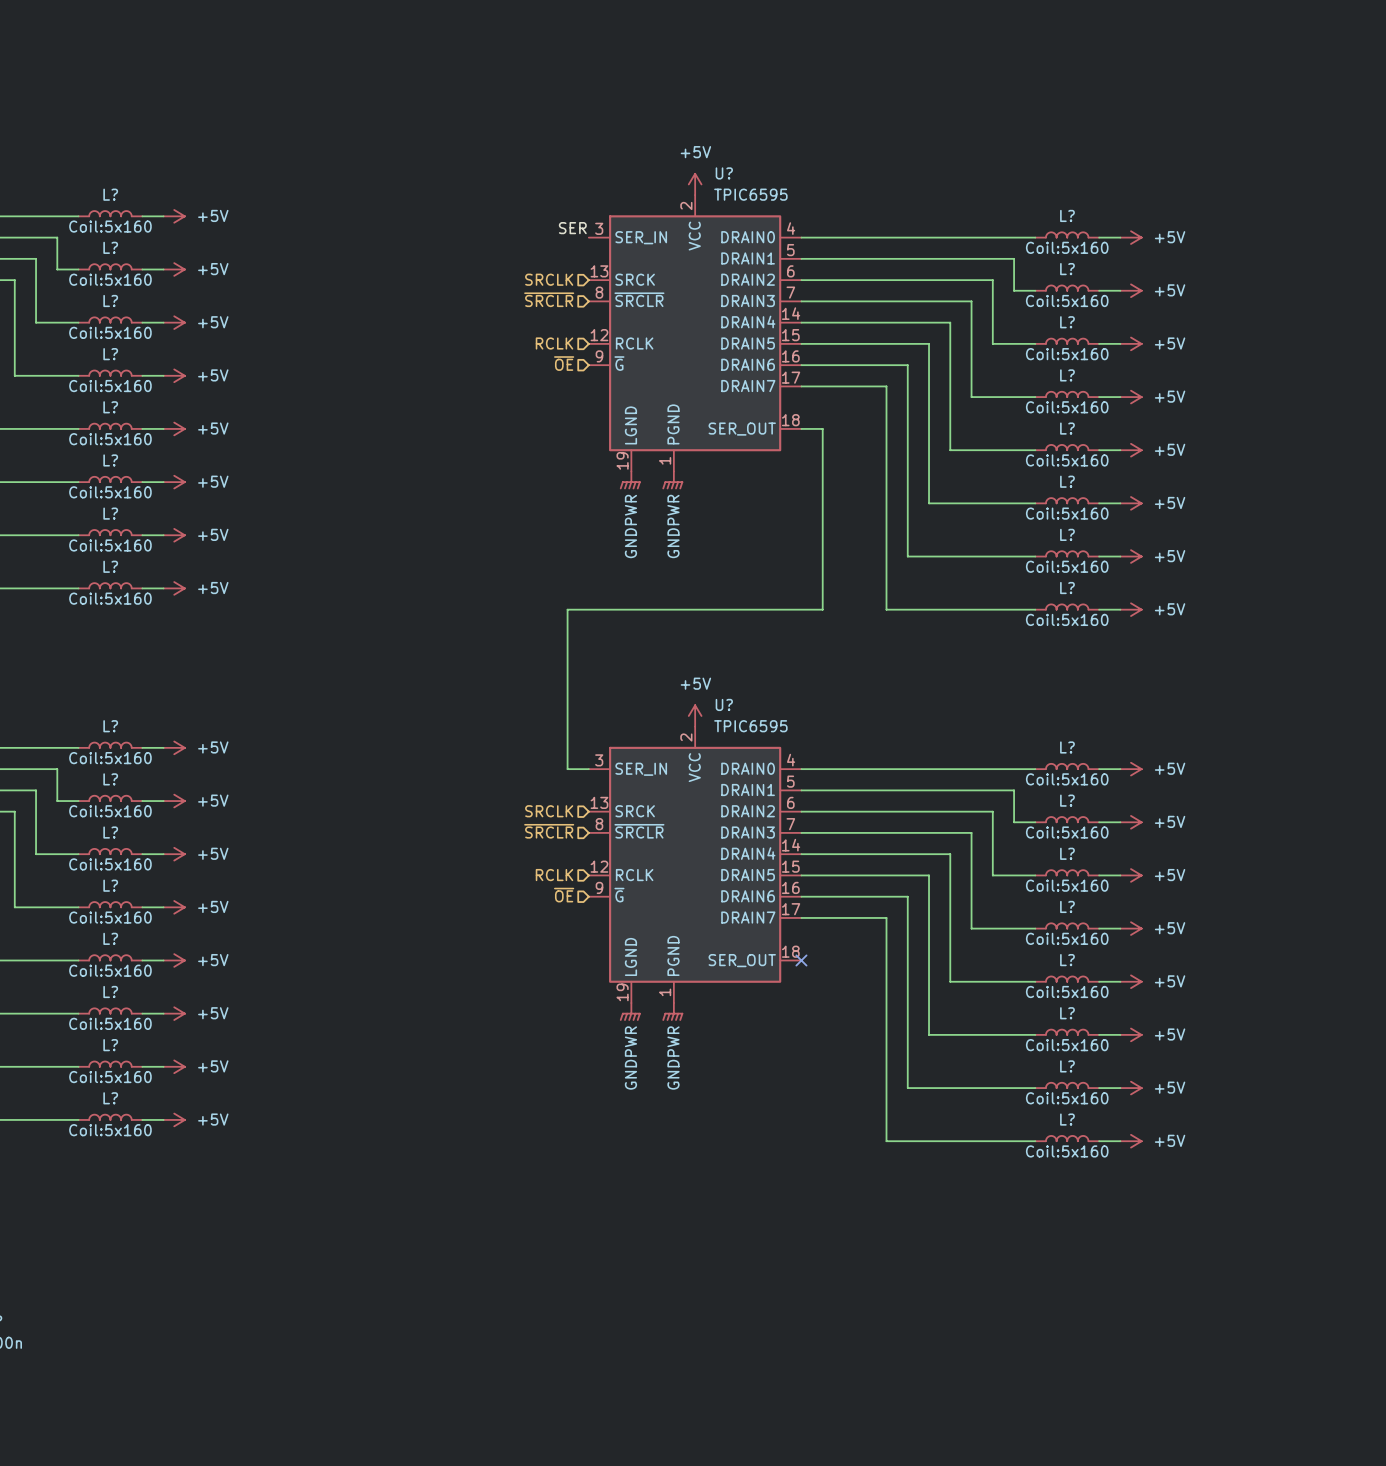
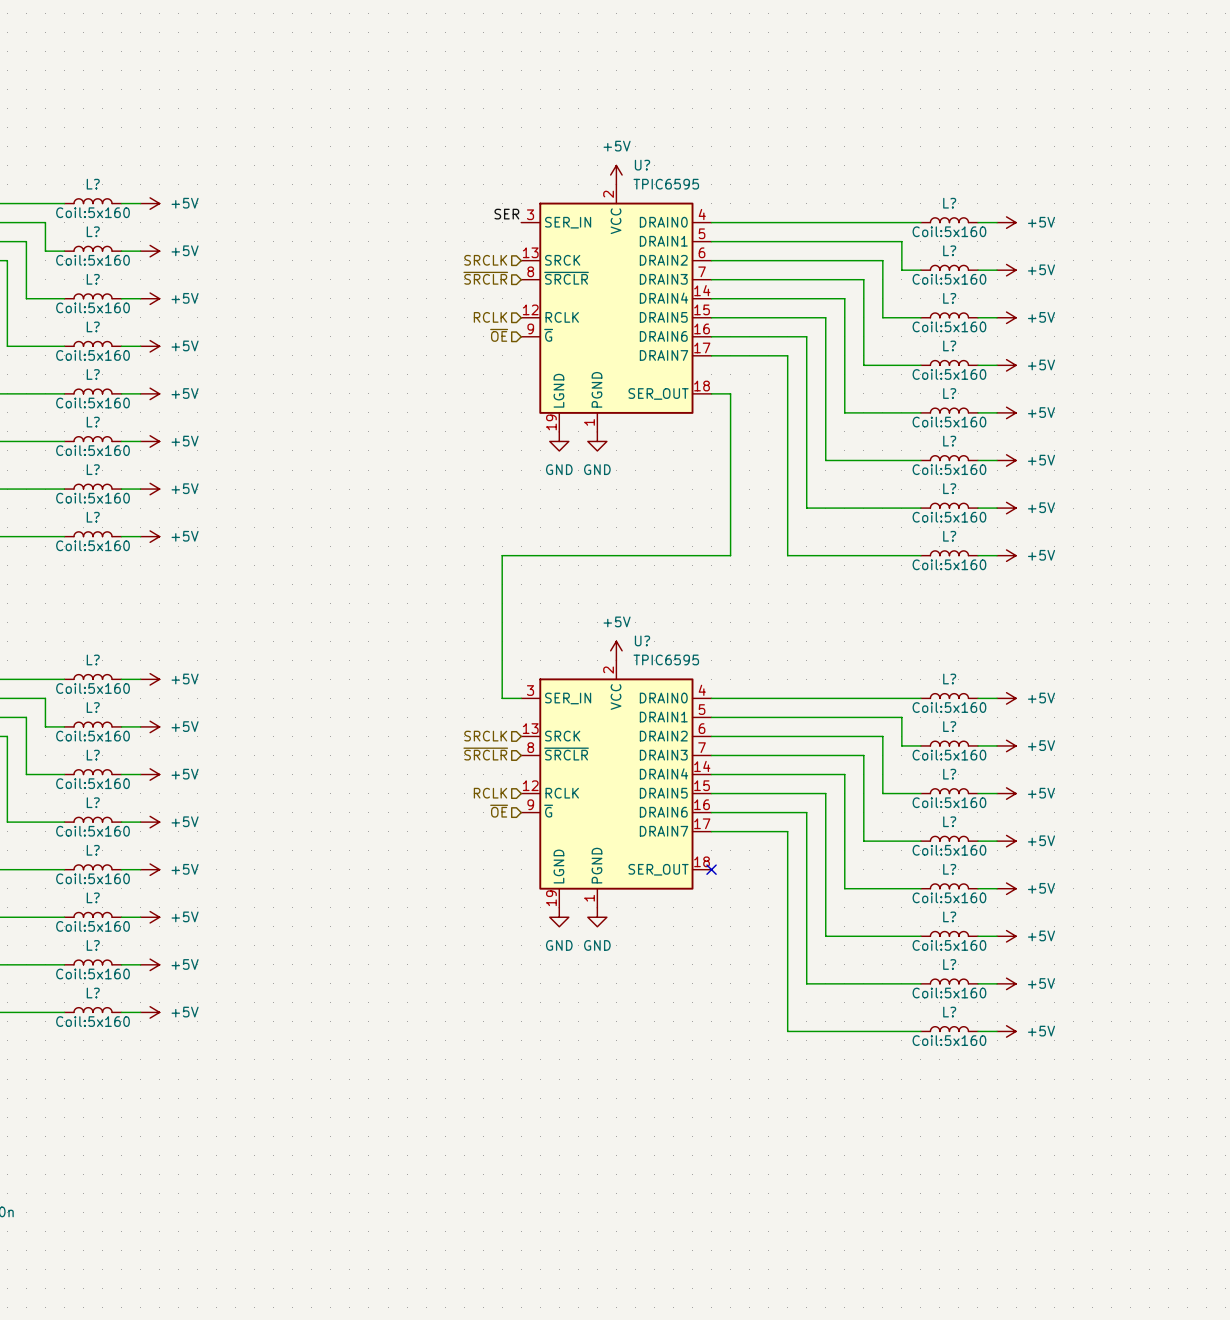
power symbol: GNDPWR (630, 480) -> GND (559, 441)
power symbol: GNDPWR (672, 480) -> GND (597, 441)
power symbol: GNDPWR (630, 1011) -> GND (559, 917)
power symbol: GNDPWR (672, 1011) -> GND (597, 917)

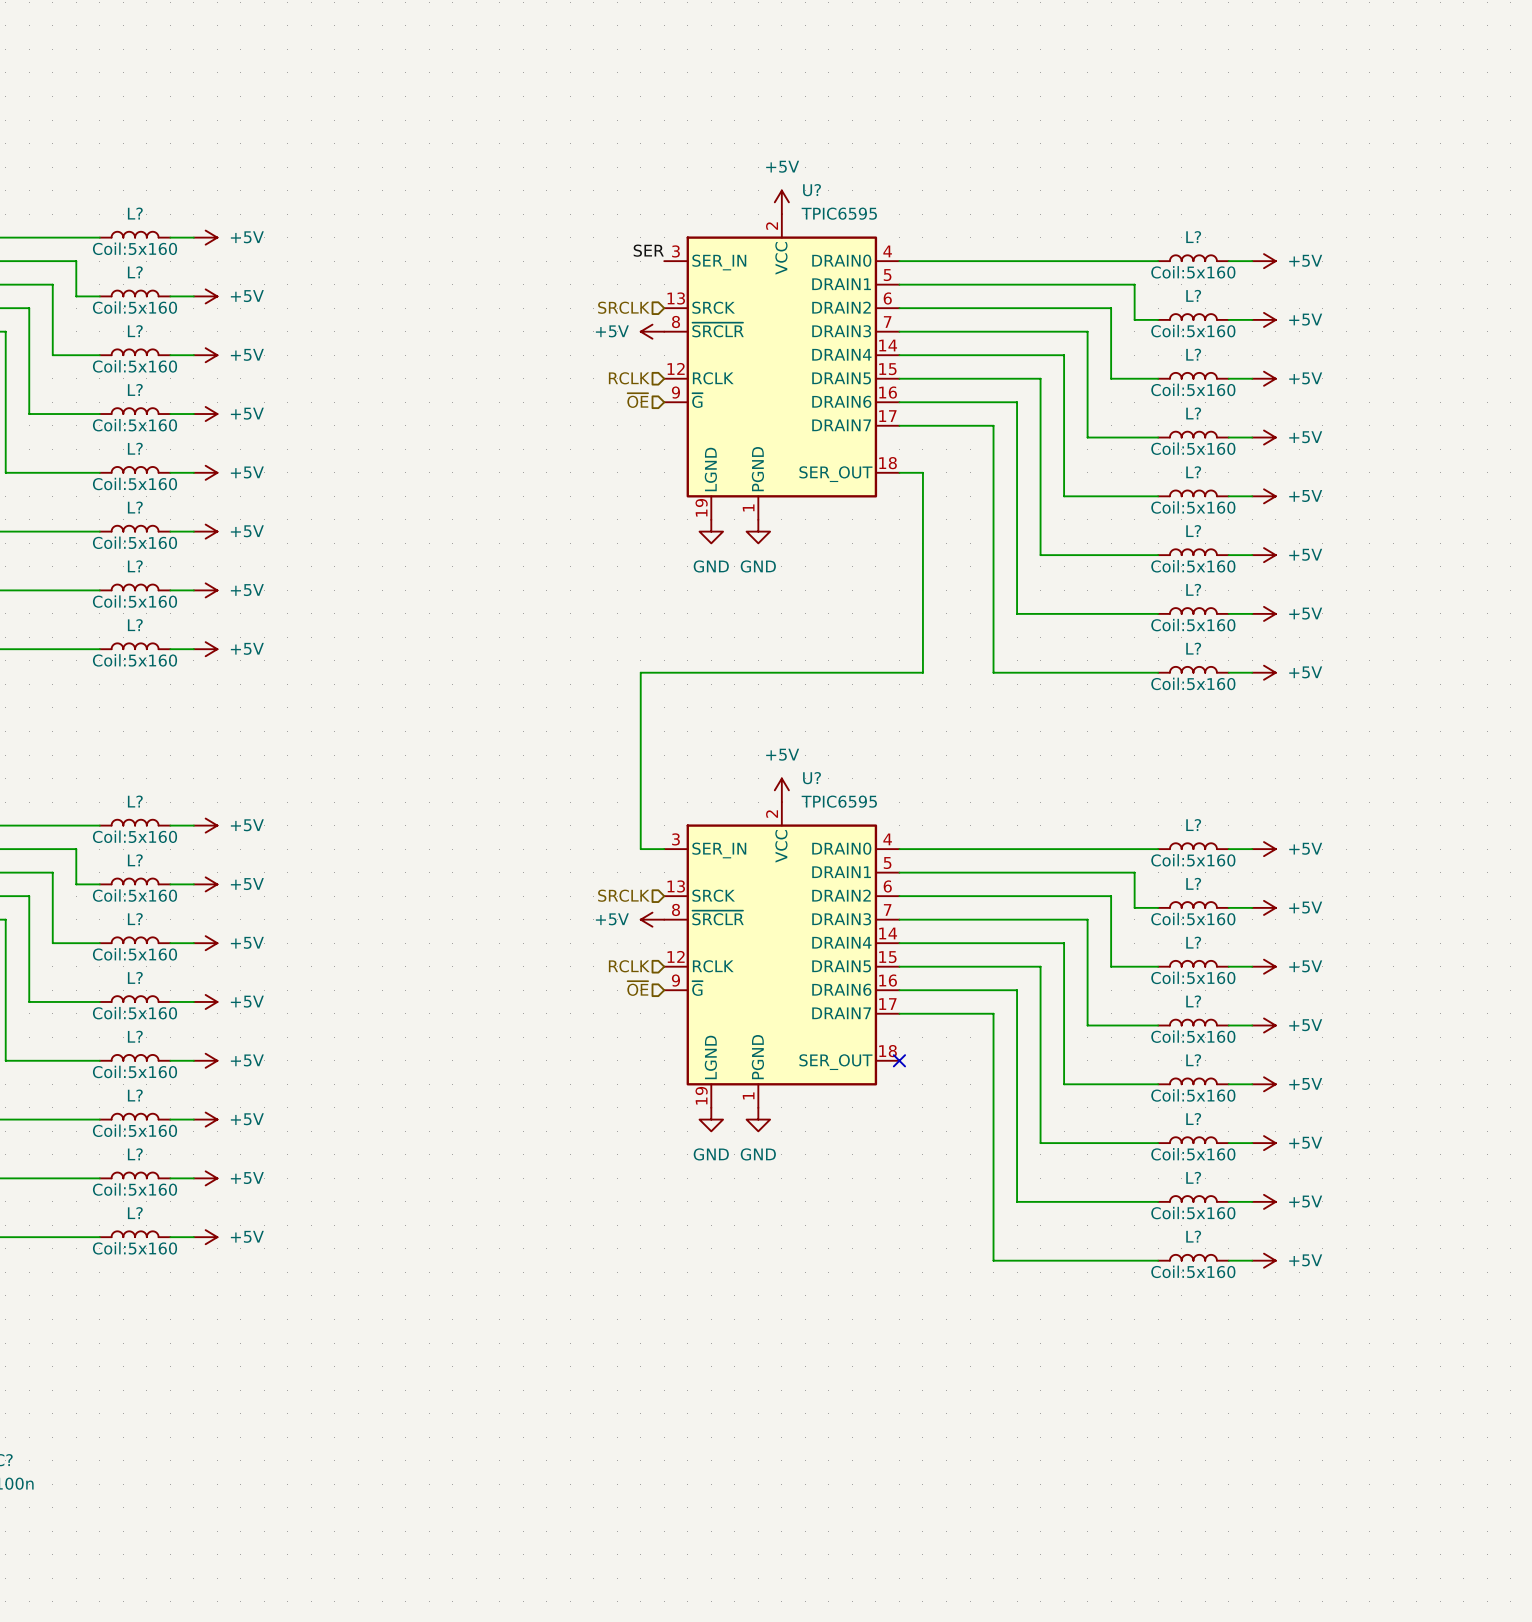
hierarchical label: ~{SRCLR} (485, 278) -> none
power symbol: none -> +5V (652, 331)
hierarchical label: ~{SRCLR} (485, 754) -> none
power symbol: none -> +5V (652, 919)

